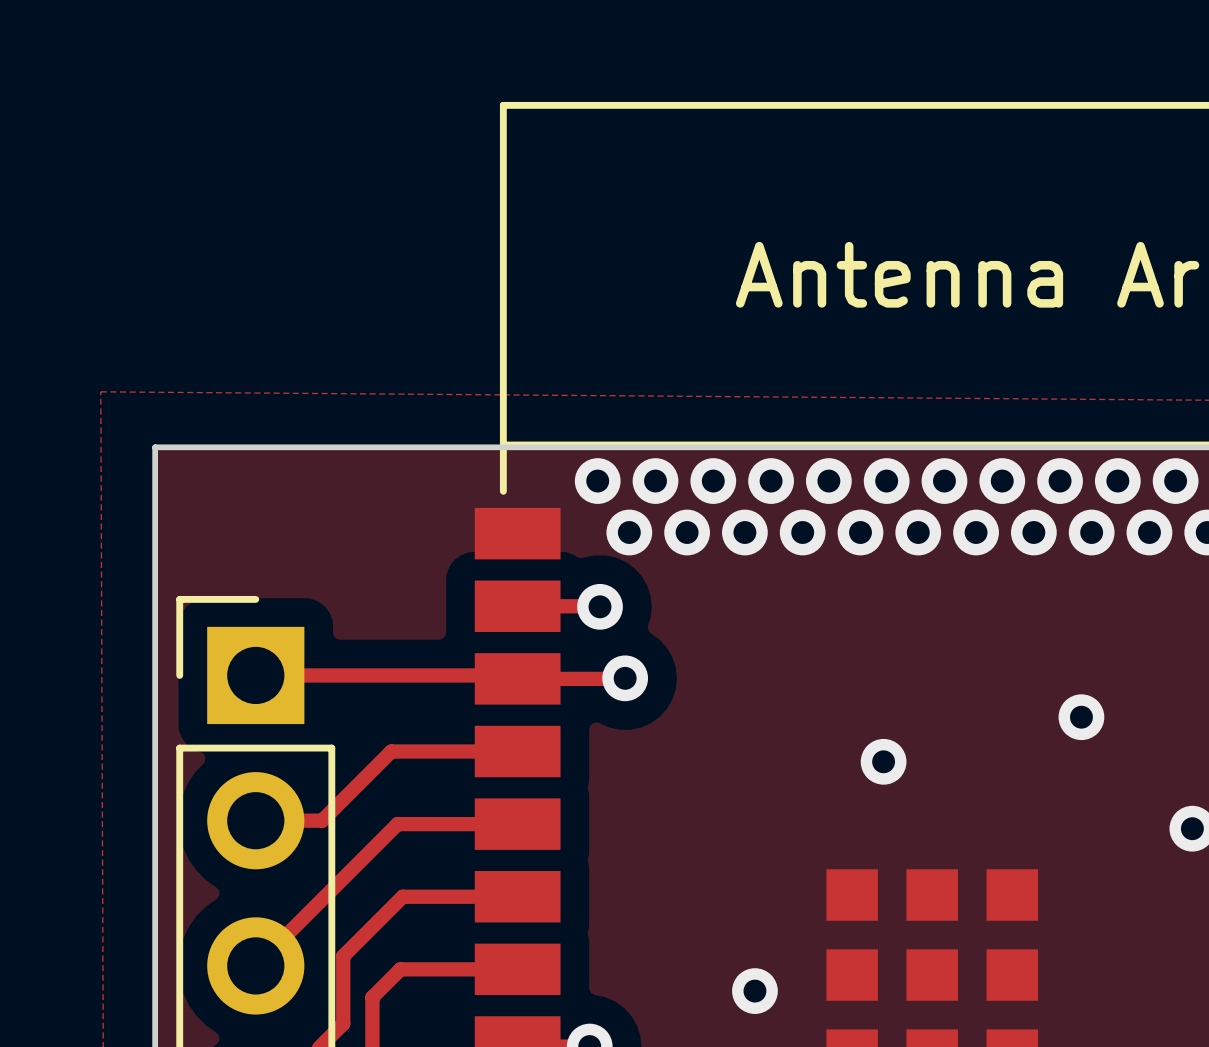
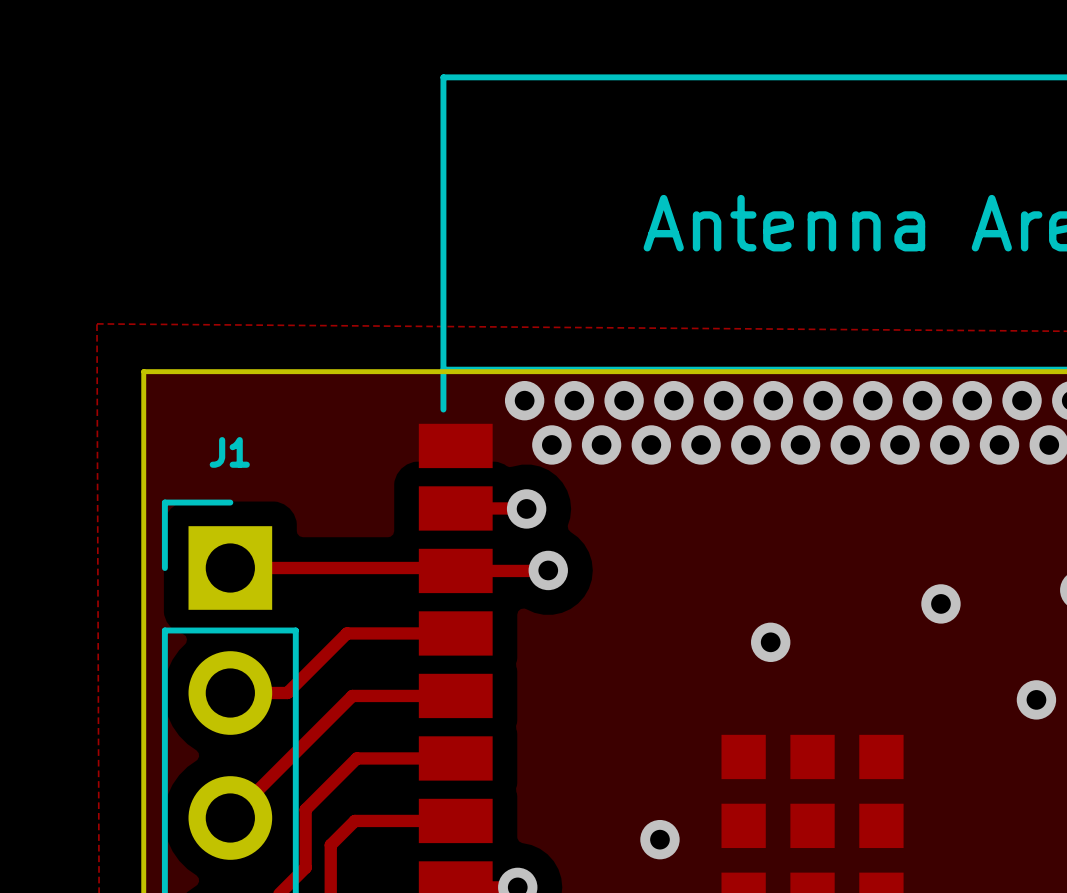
J1 name: none -> J1 (229, 452)

